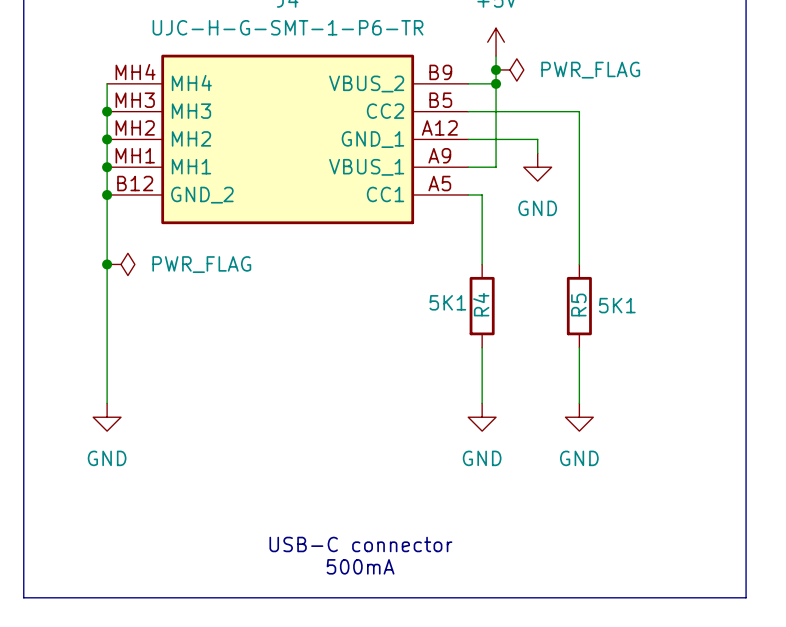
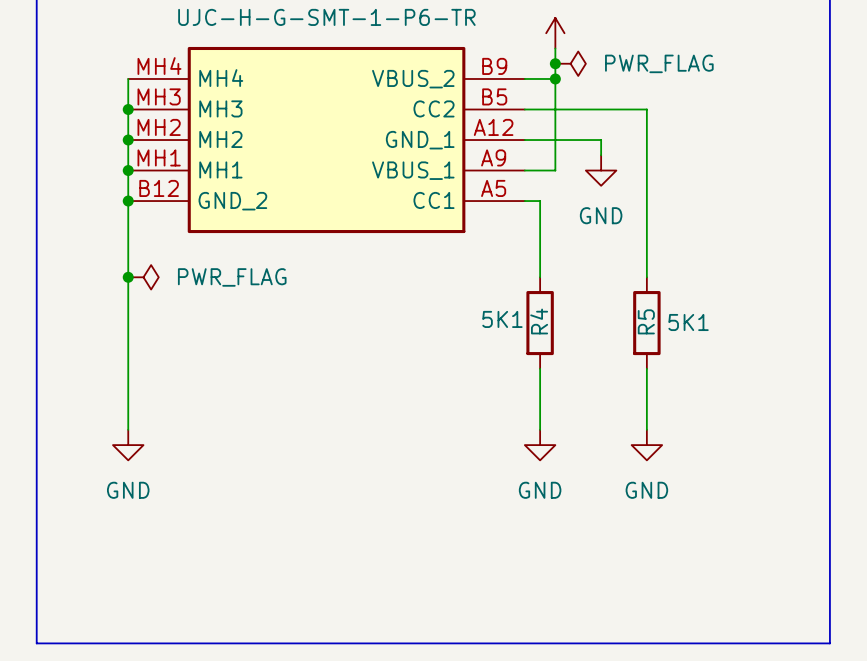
text: USB-C connector (360, 544) -> none
text: 500mA (360, 566) -> none

